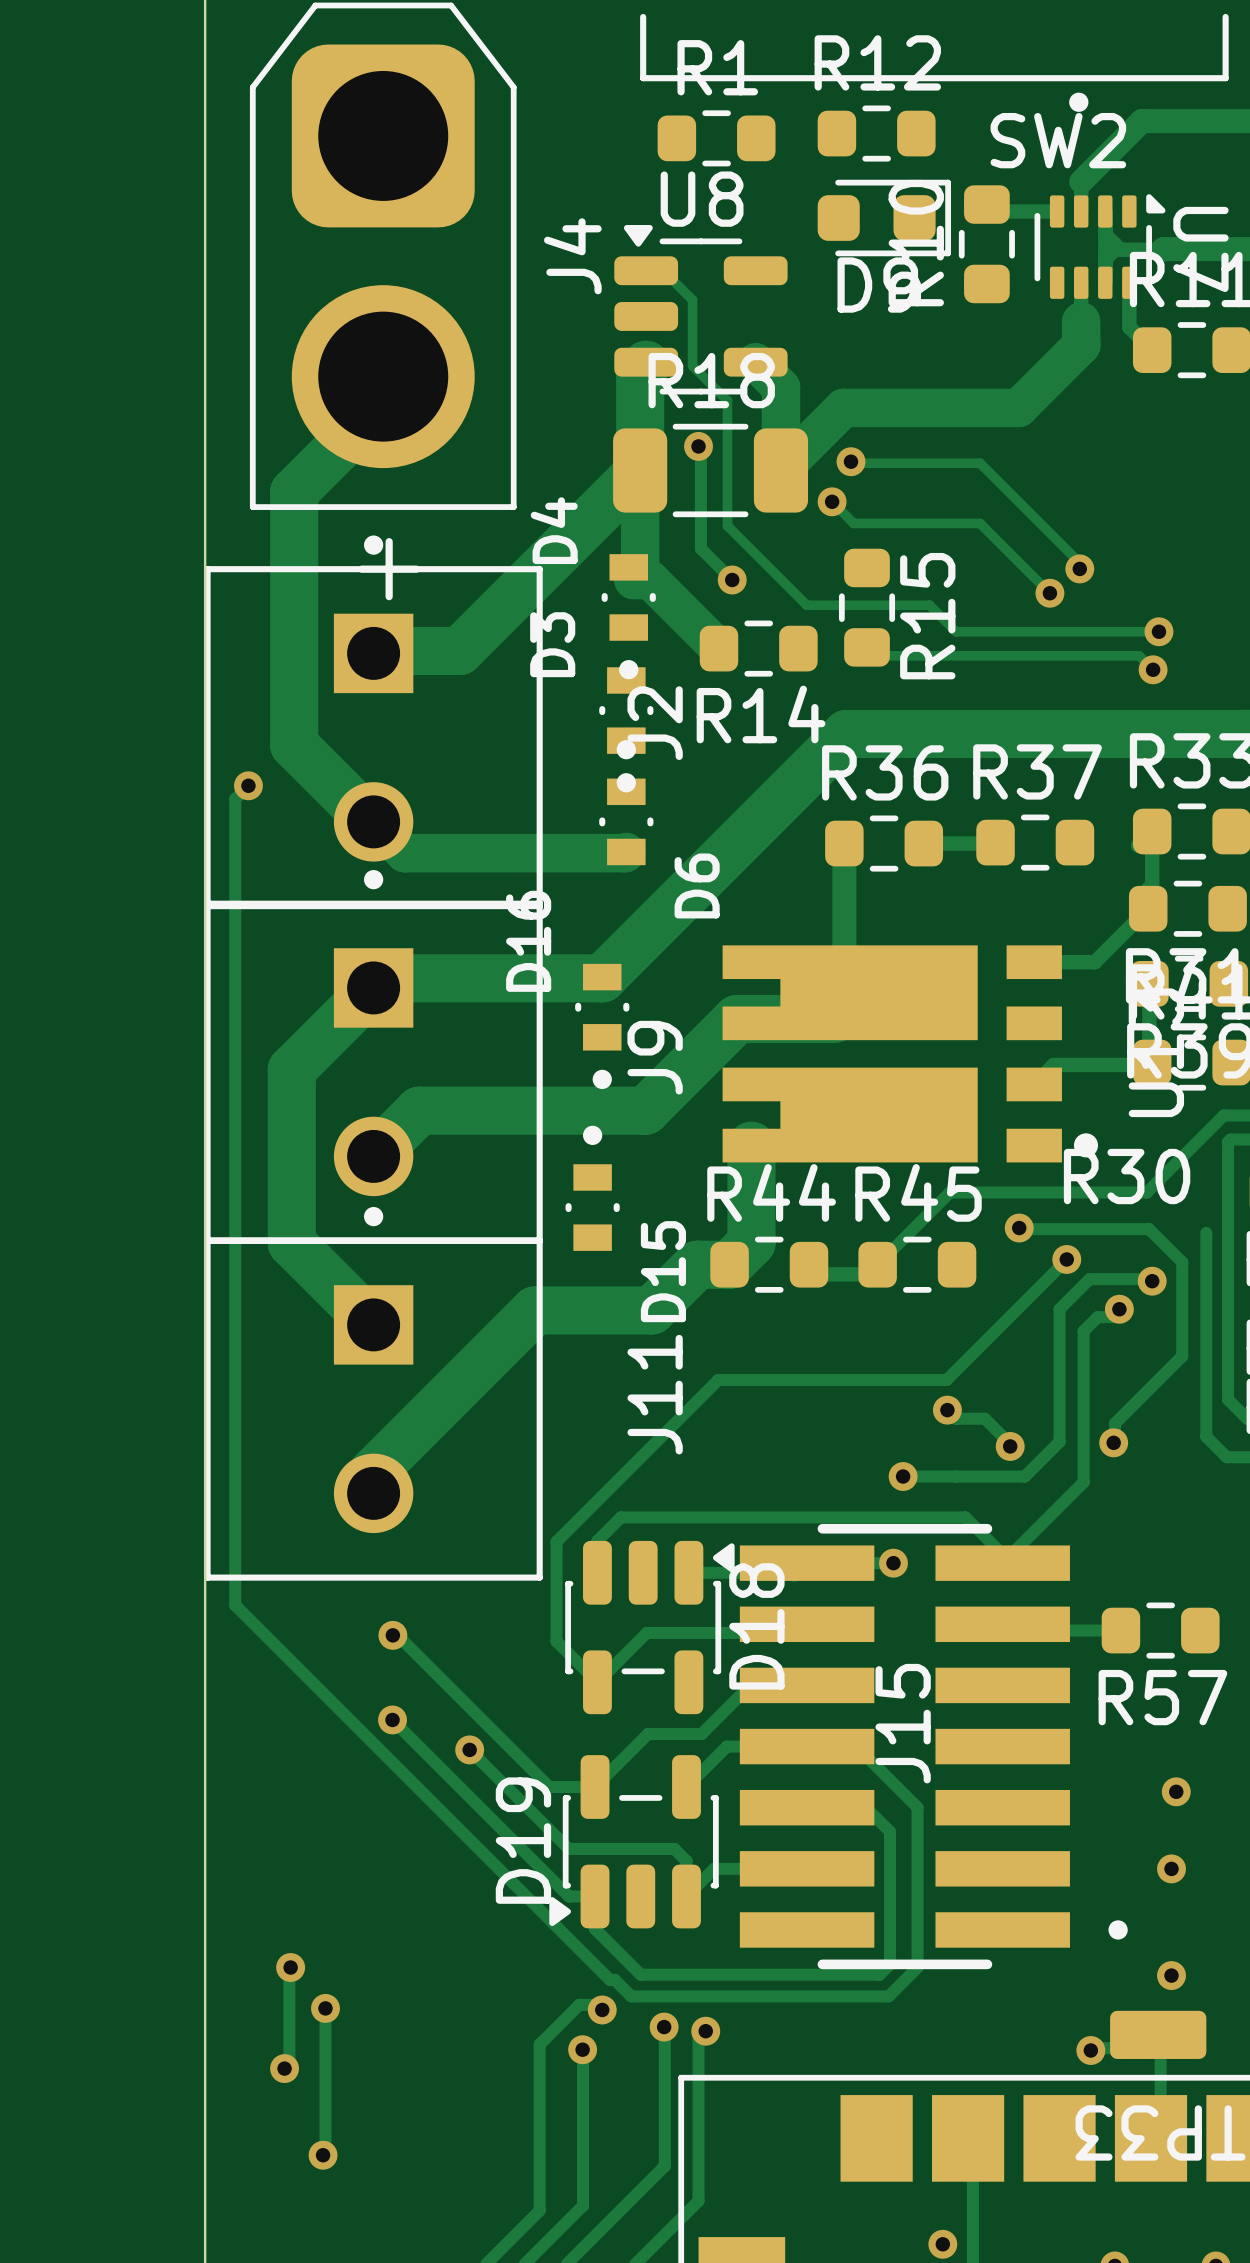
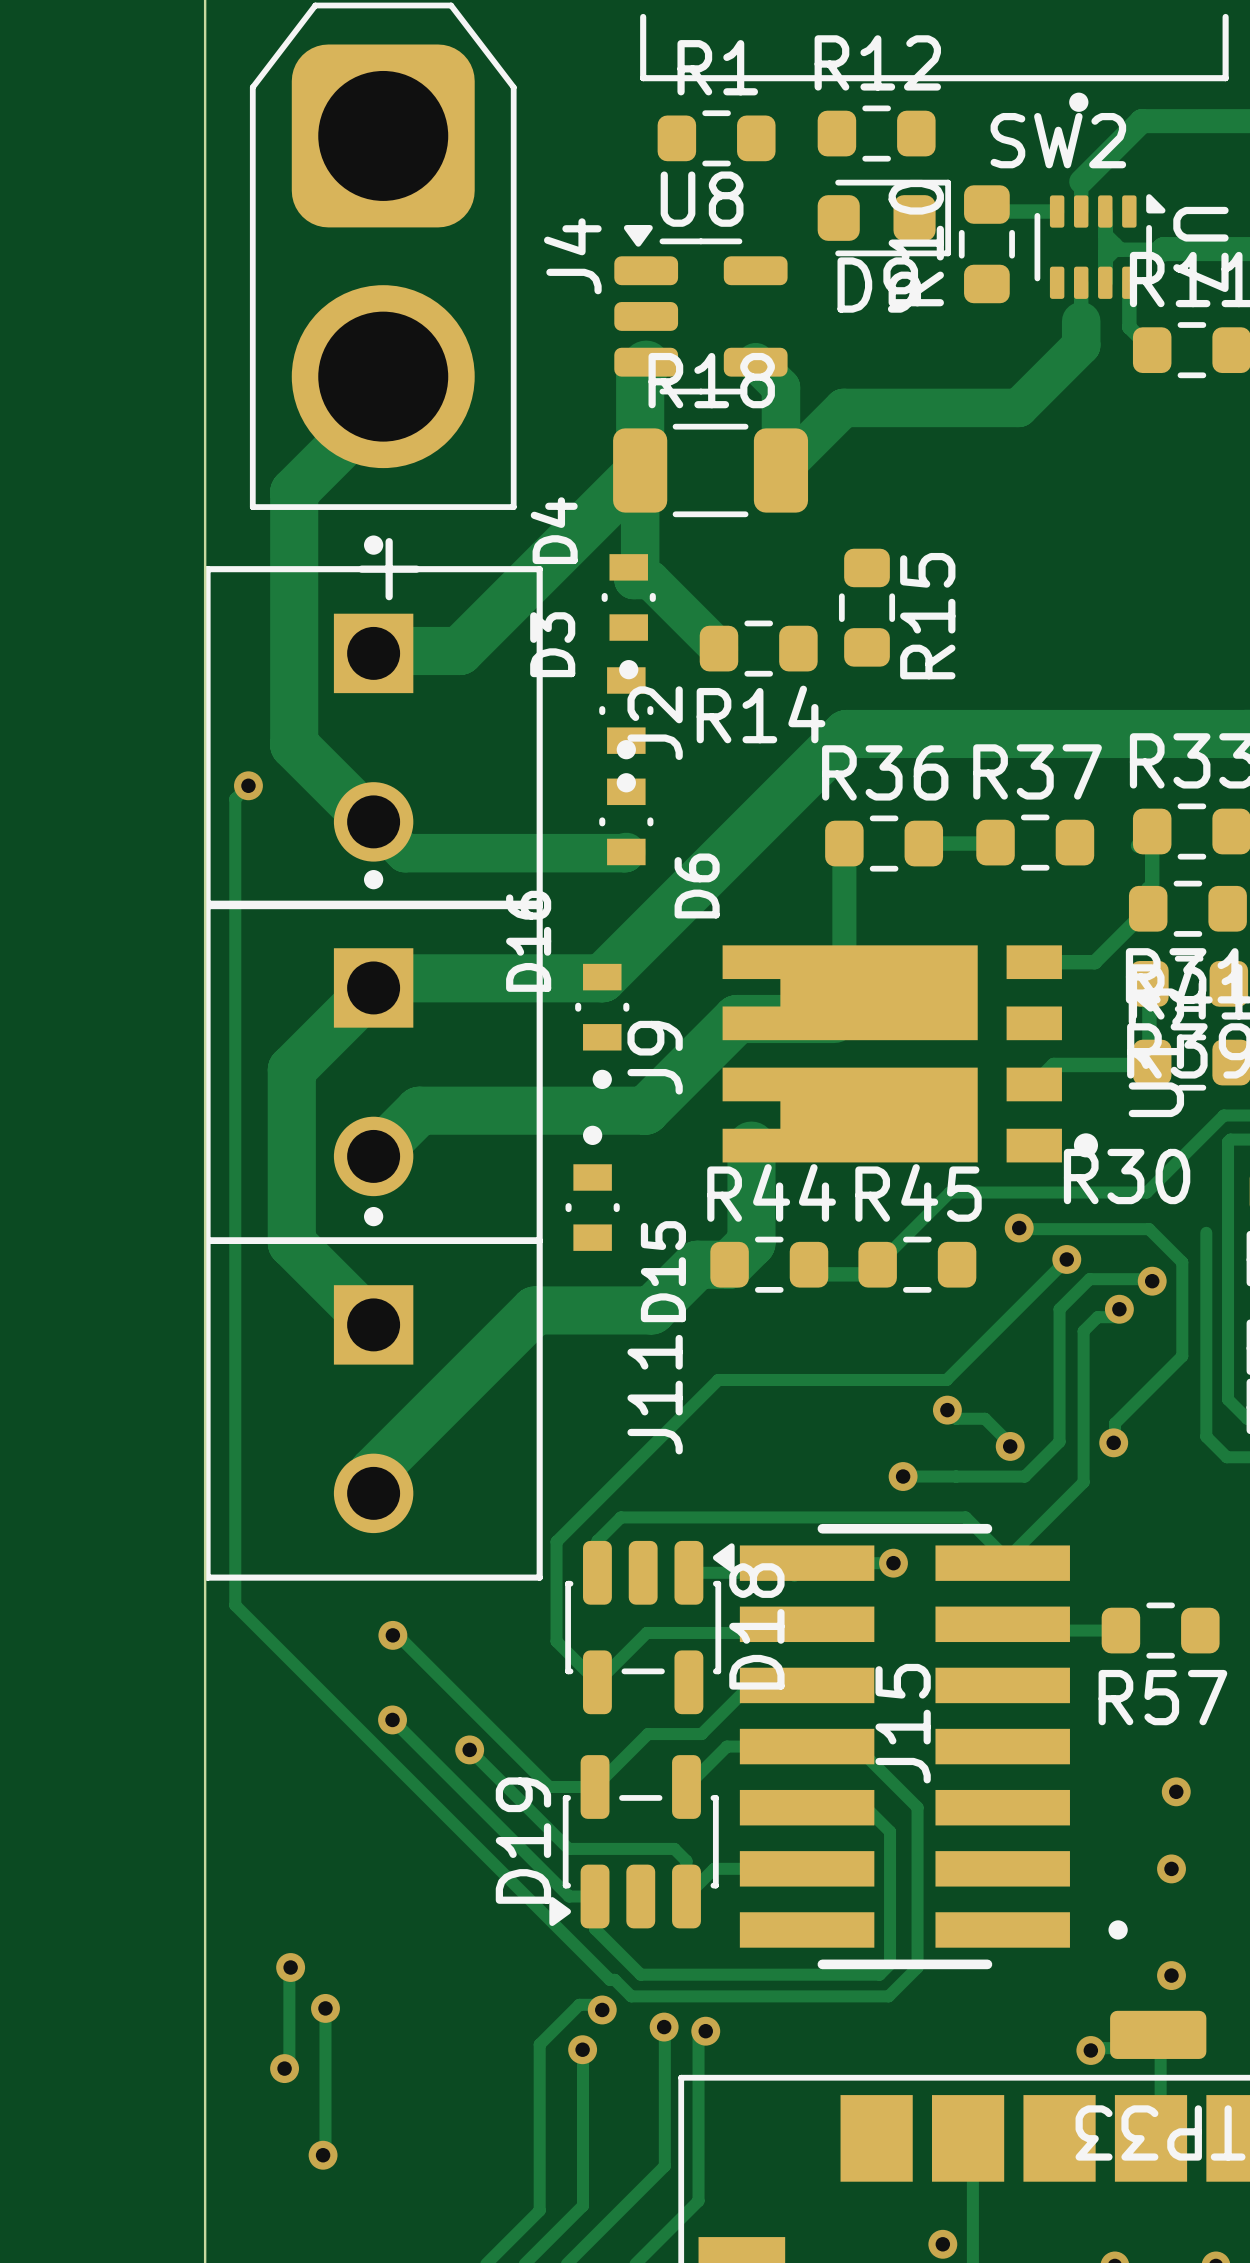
track: (646, 270) (663, 270) (692, 300) (692, 365) (727, 400) (727, 525) (806, 605) (929, 605) (956, 631) (1158, 631) -> none
track: (698, 446) (700, 448) (700, 548) (732, 580) -> none
via: (698, 446) -> none
track: (851, 461) (852, 463) (980, 463) (1079, 562) (1079, 568) -> none
via: (851, 461) -> none
track: (832, 501) (853, 523) (980, 523) (1049, 593) -> none
via: (832, 501) -> none
via: (1079, 568) -> none
via: (732, 580) -> none
via: (1049, 593) -> none
via: (1158, 631) -> none
track: (867, 647) (875, 655) (1139, 655) (1153, 669) -> none
via: (1153, 669) -> none

